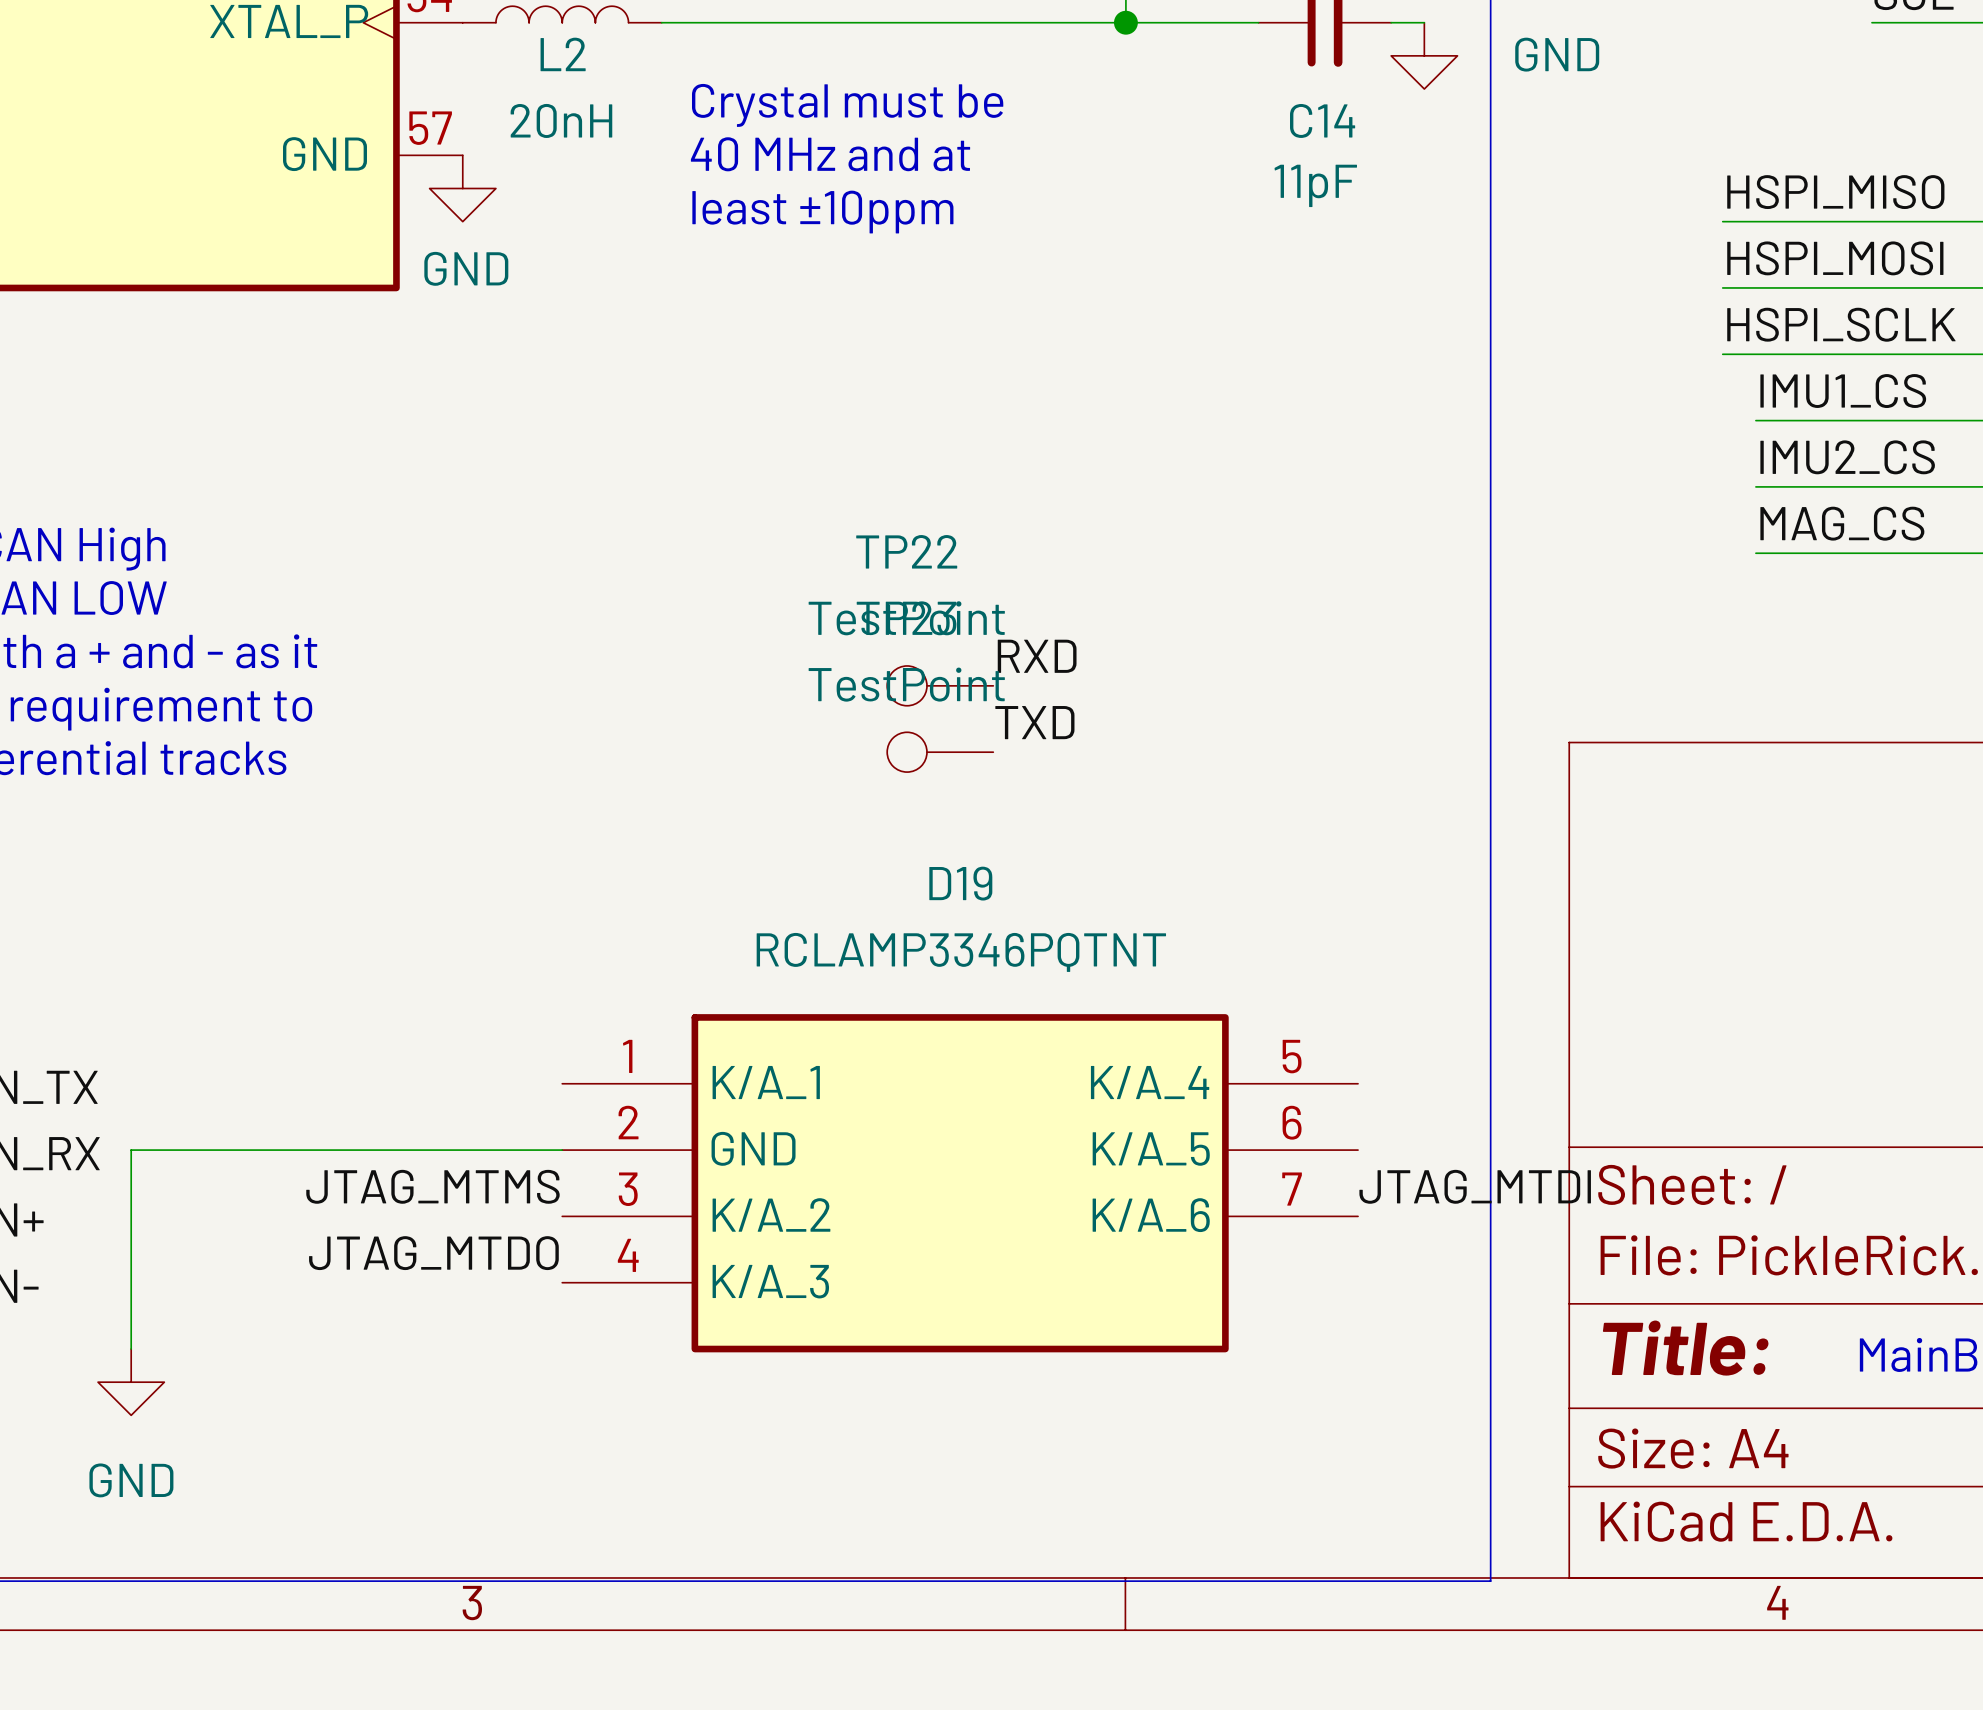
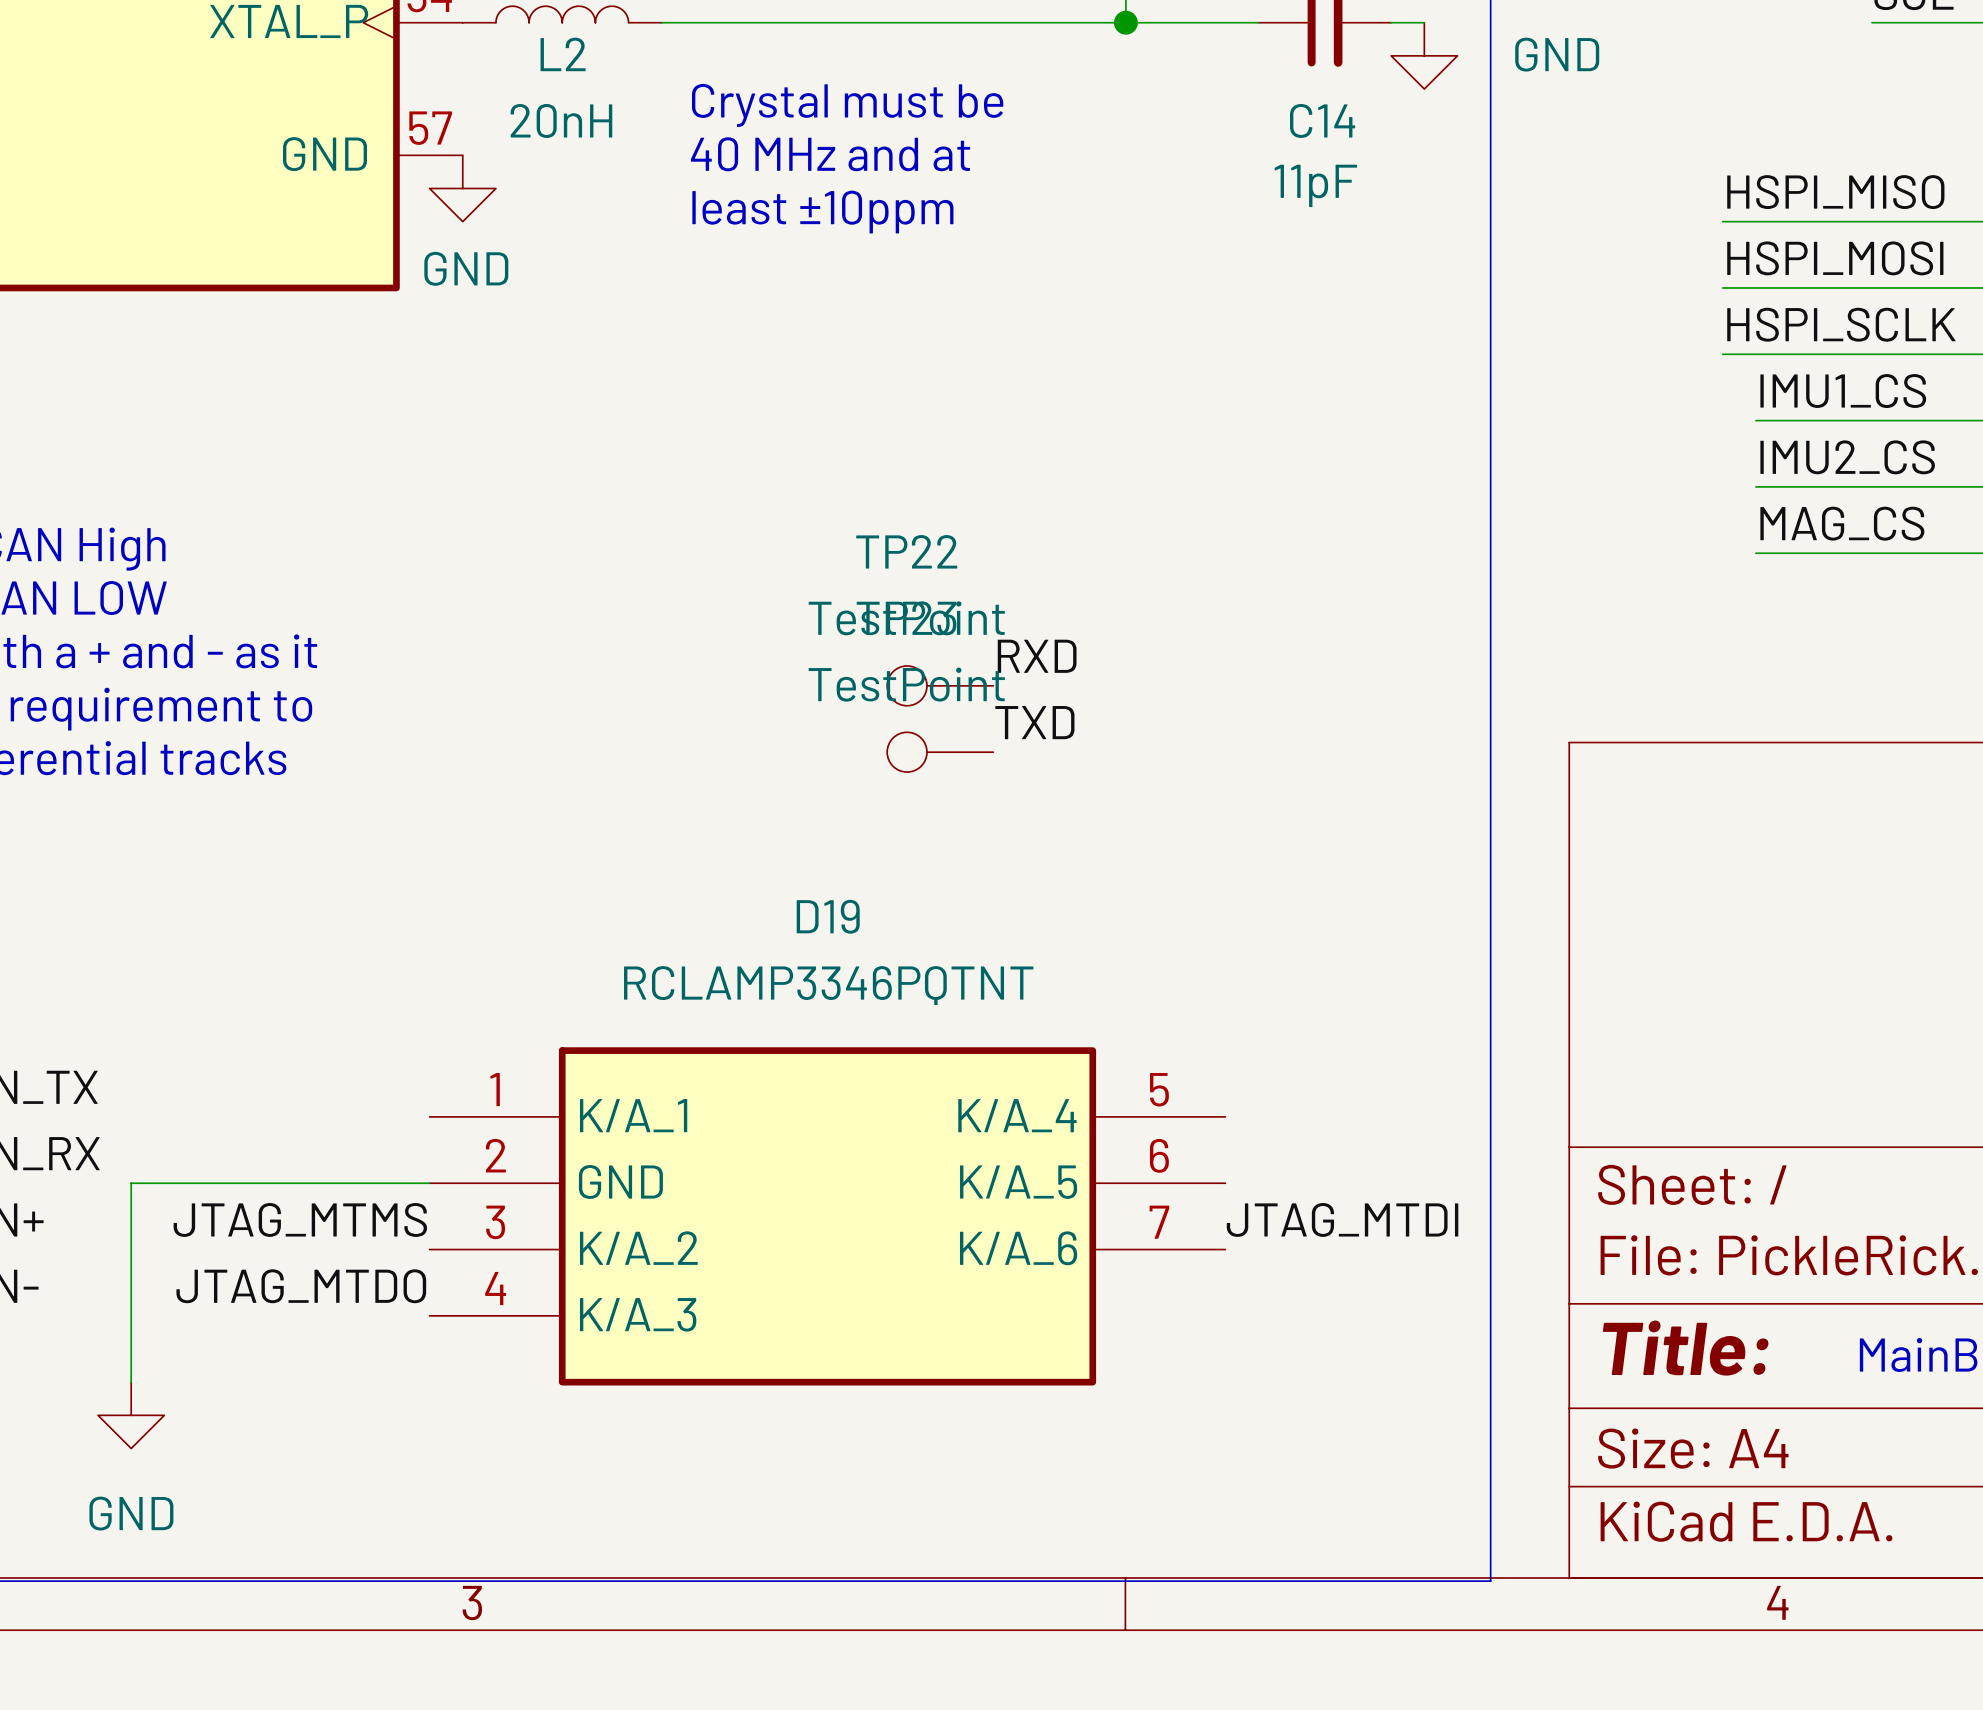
wire: (562, 1150) (131, 1150) (131, 1183) -> (429, 1183) (131, 1183)
D19 position: (960, 1183) -> (827, 1216)
label position: JTAG_MTMS (432, 1186) -> JTAG_MTMS (300, 1219)
label position: JTAG_MTDI (1475, 1186) -> JTAG_MTDI (1342, 1219)
label position: JTAG_MTDO (433, 1253) -> JTAG_MTDO (301, 1286)
power symbol position: GND (131, 1382) -> GND (131, 1415)

